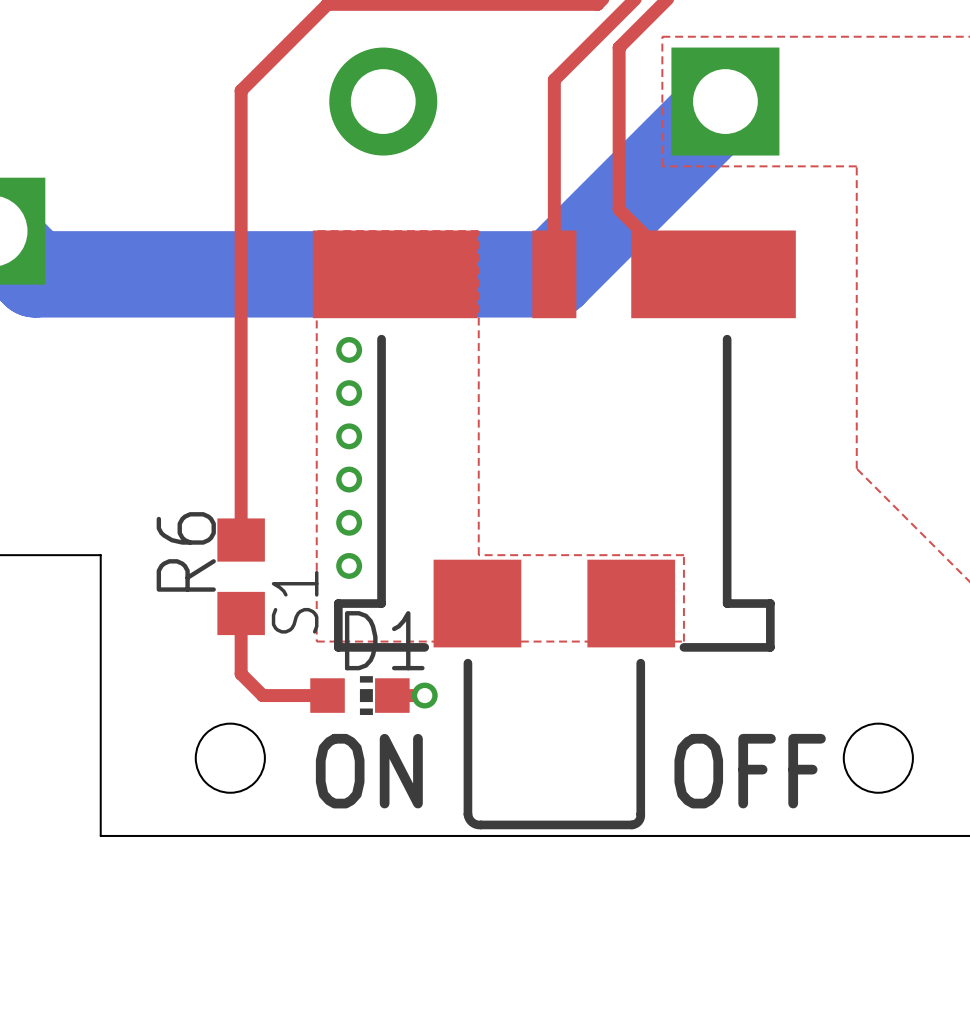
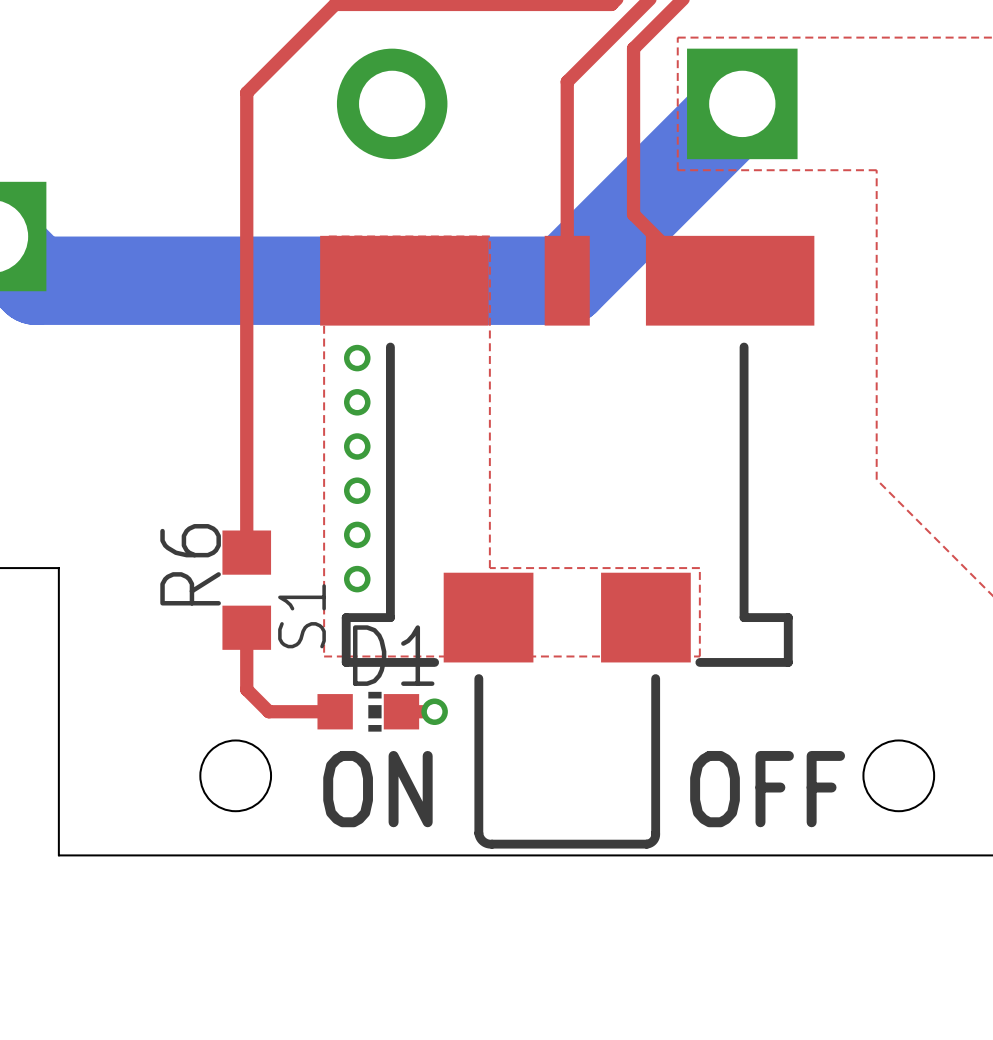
board edge: (57, 555) (100, 555) (100, 835) -> (58, 568) (58, 855) (103, 855)

